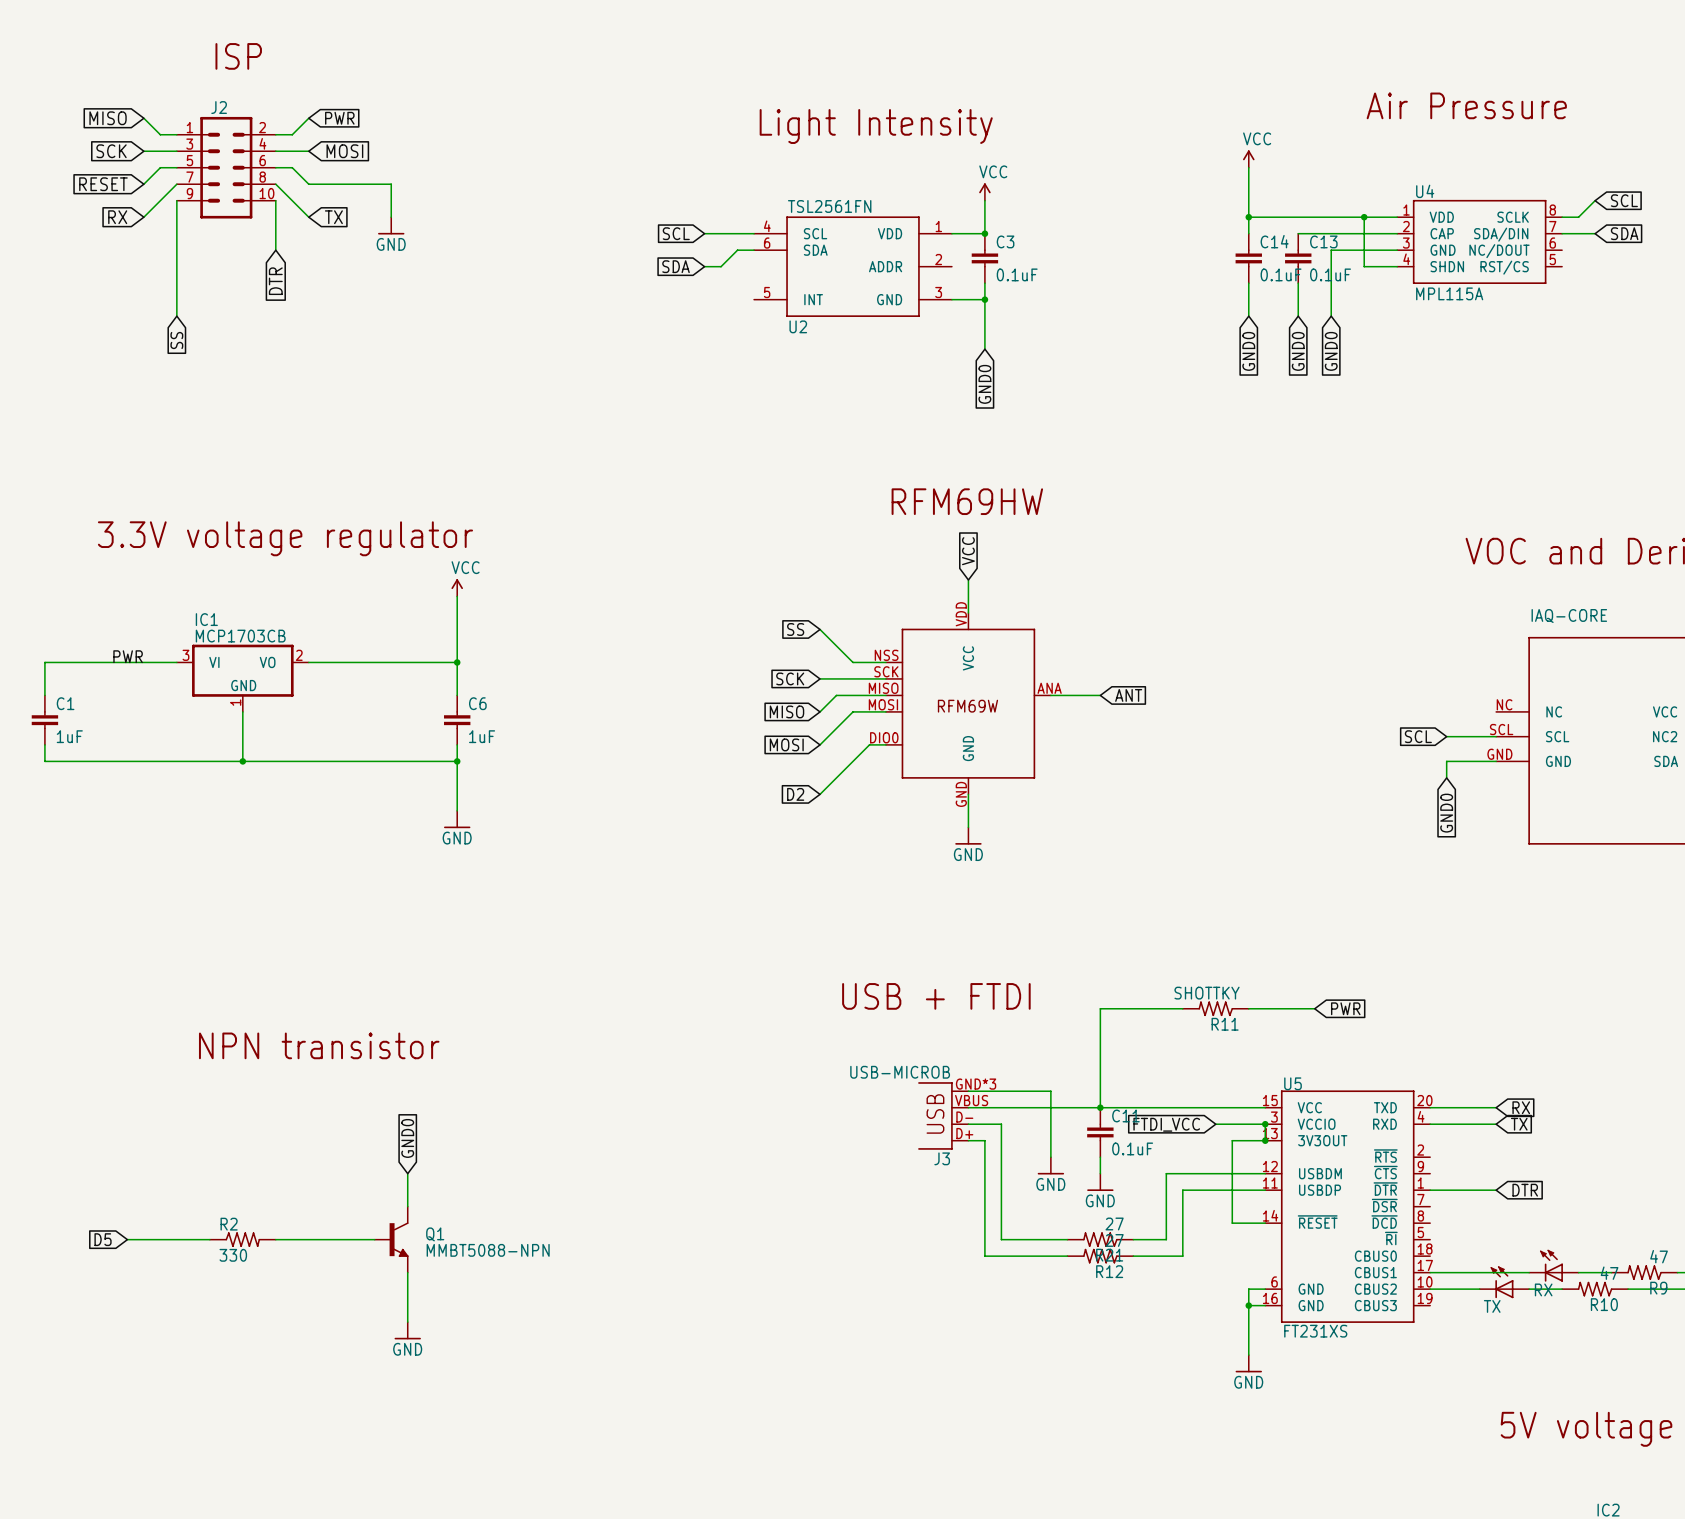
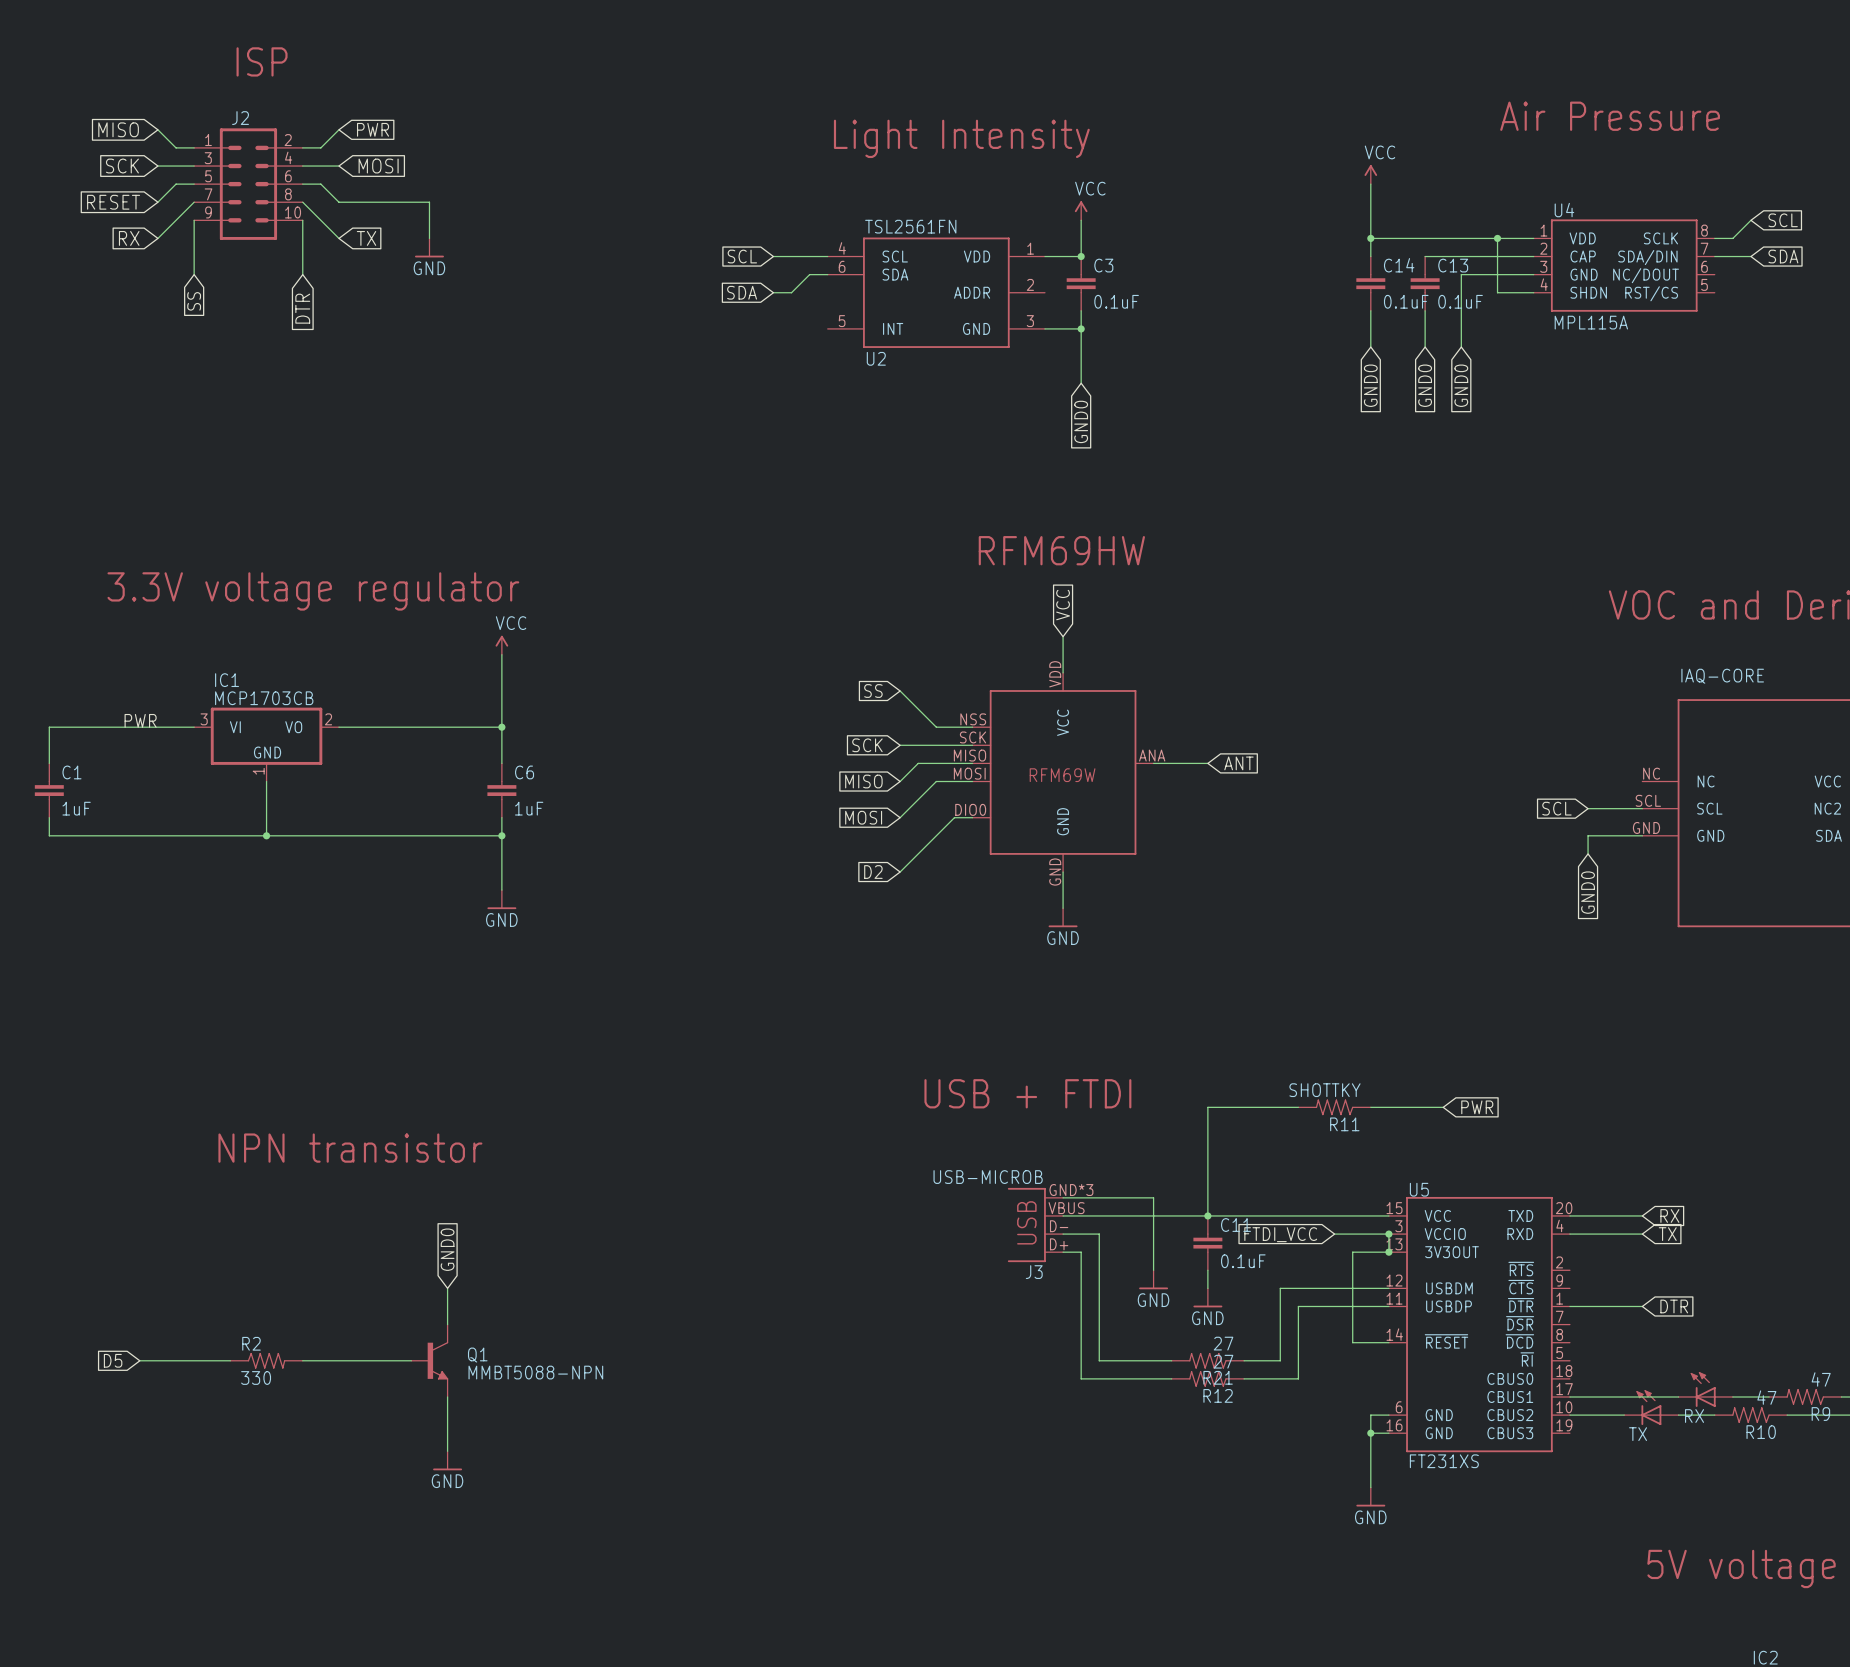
wire: (176, 250) (176, 316) -> none
global label position: SS (176, 340) -> SS (194, 301)

